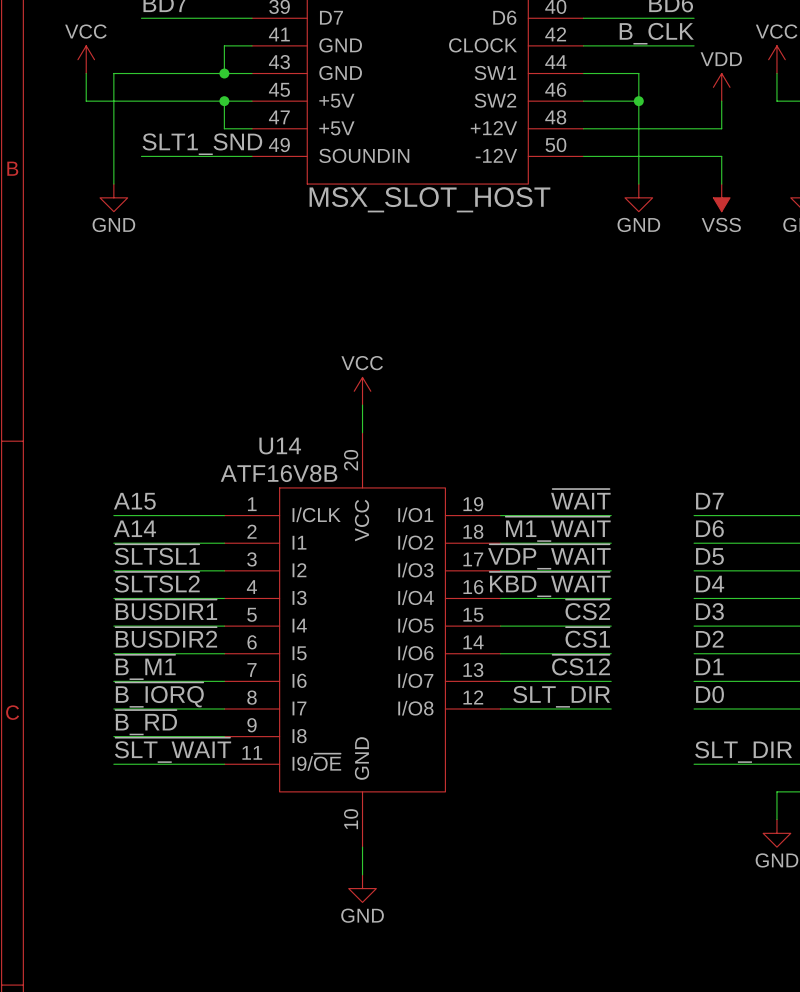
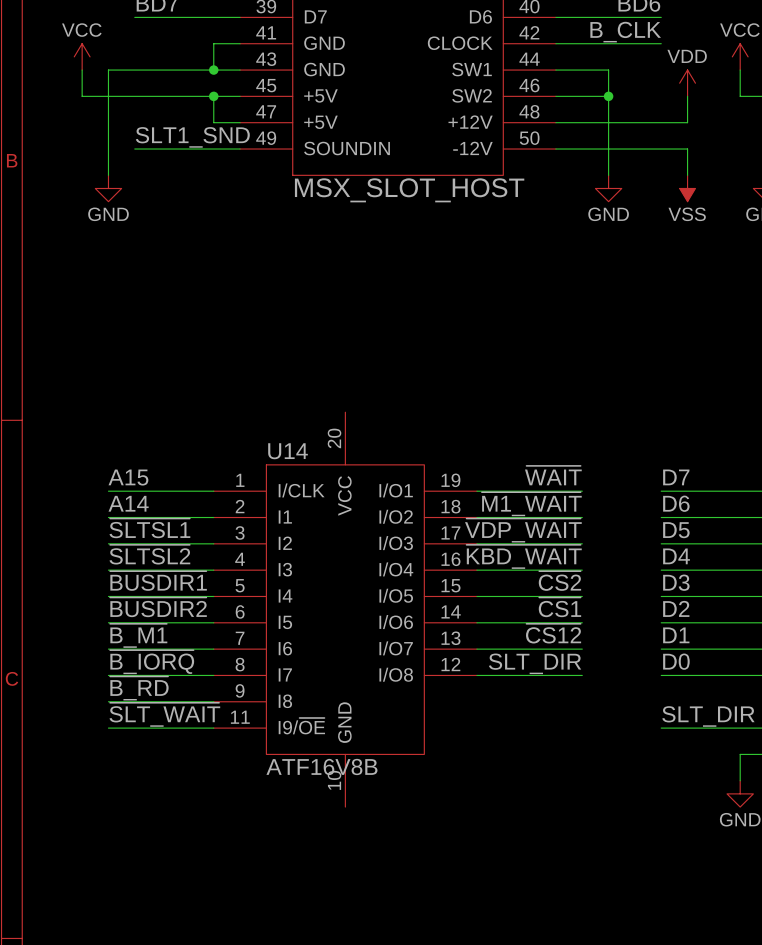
power symbol: VCC (362, 391) -> none
wire: (362, 405) (362, 432) -> none
U14 name position: U14 (280, 446) -> U14 (288, 451)
U14 value position: ATF16V8B (279, 473) -> ATF16V8B (321, 766)
wire: (362, 847) (362, 874) -> none
power symbol: GND (362, 888) -> none

